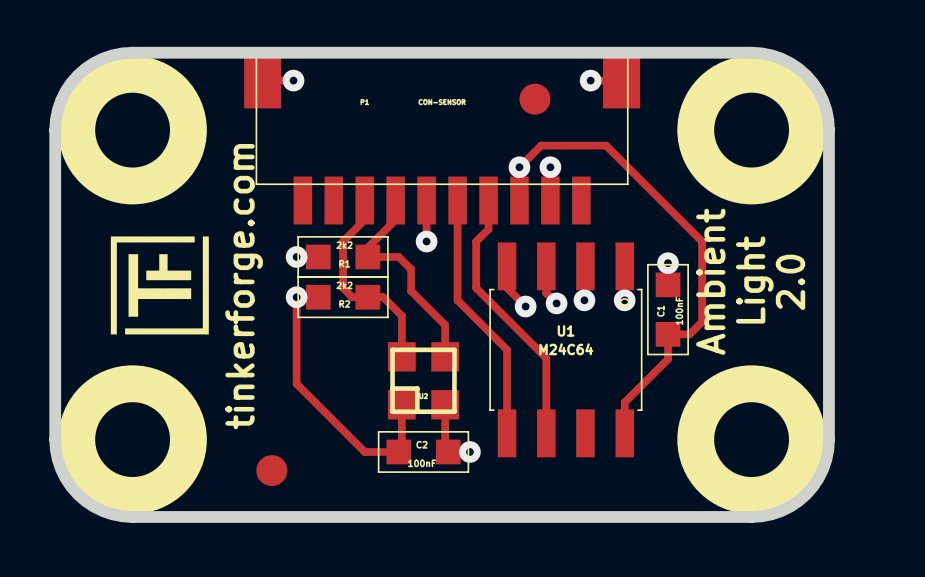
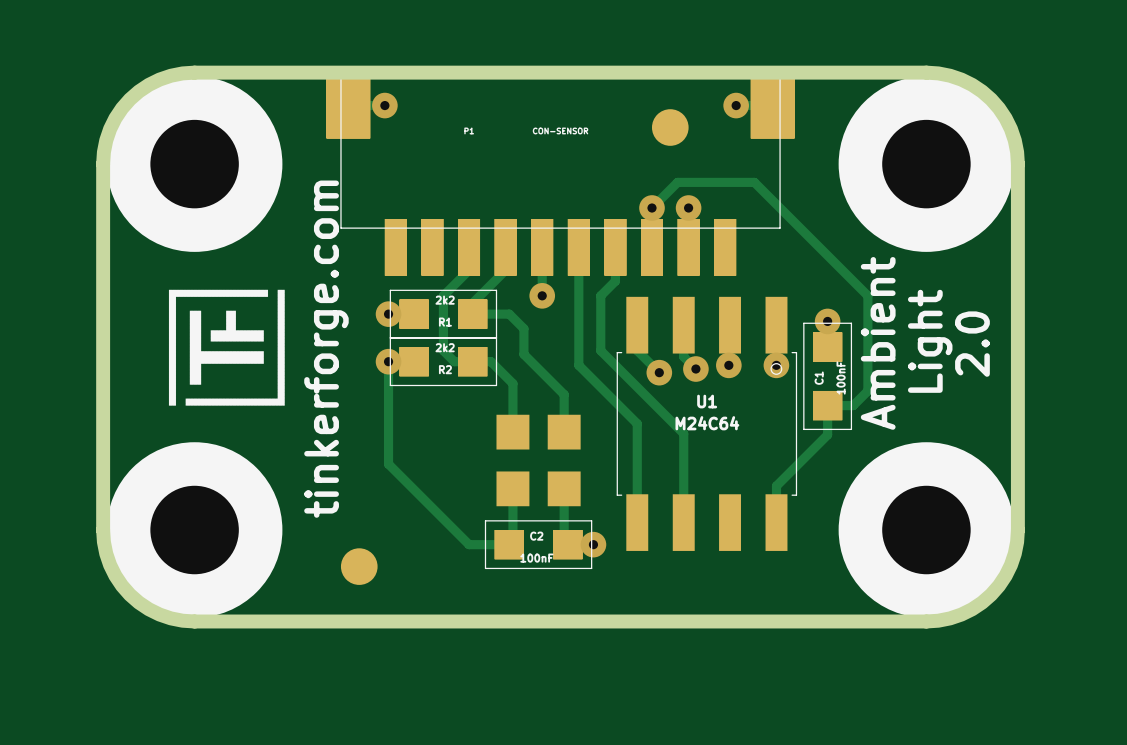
part: none -> (560, 174)
part: none -> (443, 314)
part: none -> (443, 361)
part: none -> (827, 376)
part: (423, 380) -> none
part: none -> (538, 460)
part: none -> (538, 544)

